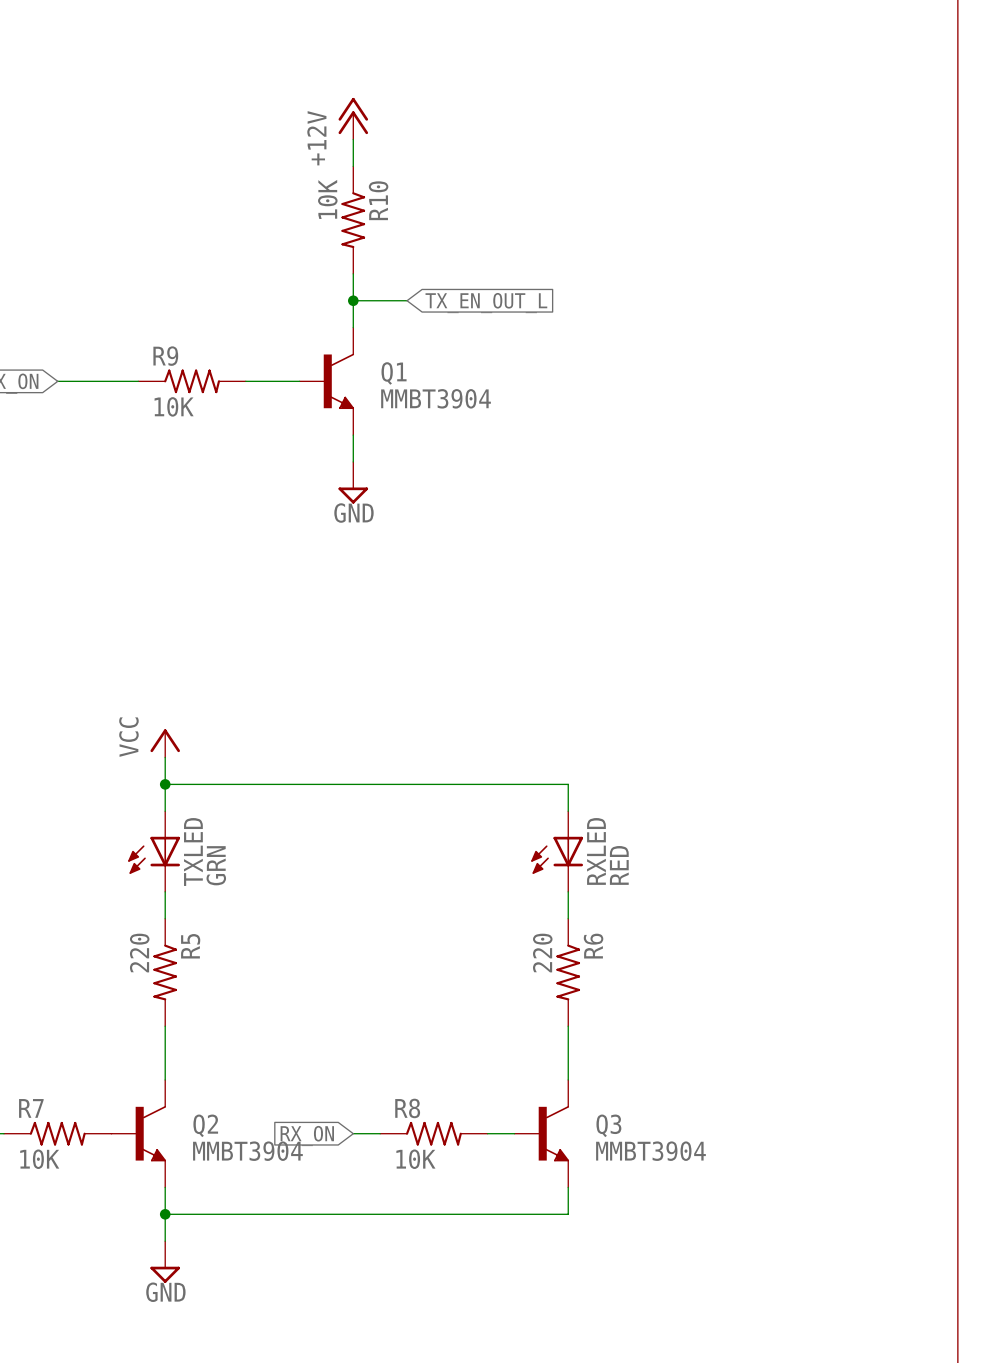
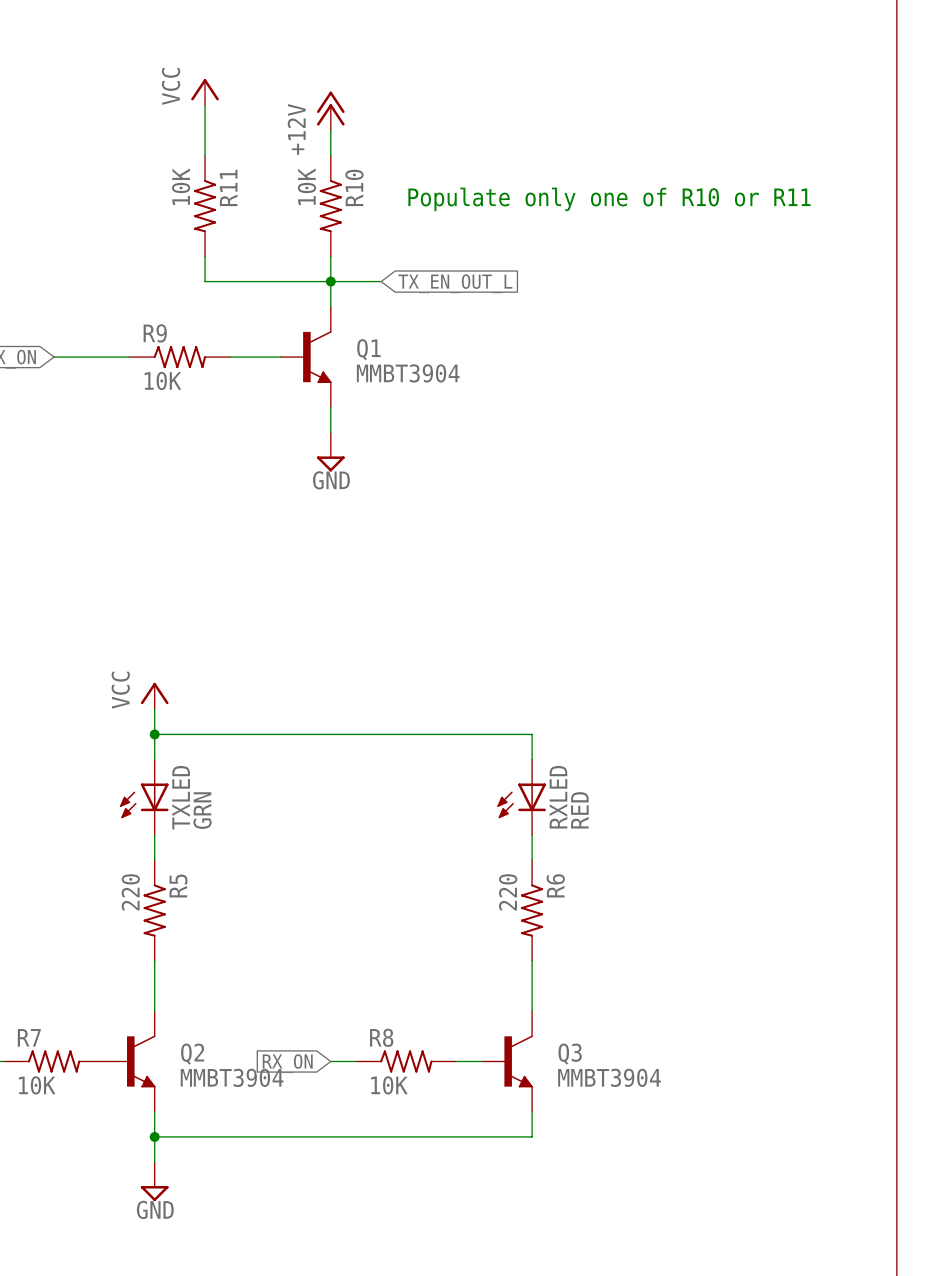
power symbol: none -> VCC (205, 92)
wire: none -> (205, 105) (205, 155)
text: none -> Populate only one of R10 or R11 (609, 199)
R11: none -> 10K (205, 206)
wire: none -> (205, 256) (205, 281) (330, 281)

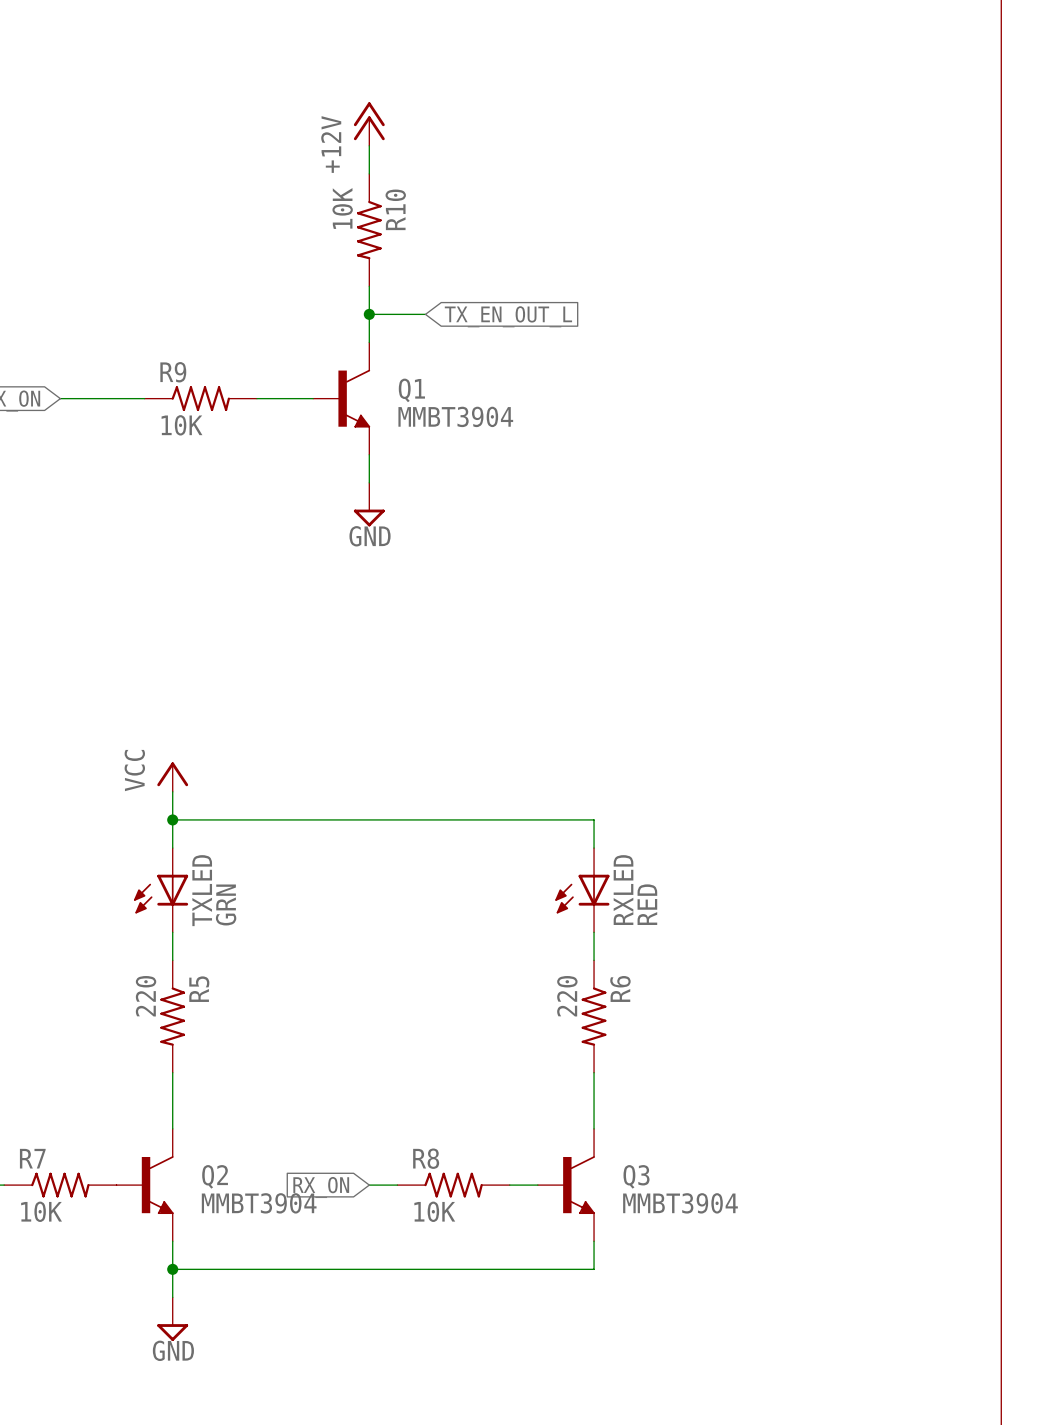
power symbol: VCC (205, 92) -> none
wire: (205, 105) (205, 155) -> none
text: Populate only one of R10 or R11 (609, 199) -> none
R11: 10K (205, 206) -> none
wire: (205, 256) (205, 281) (330, 281) -> none

